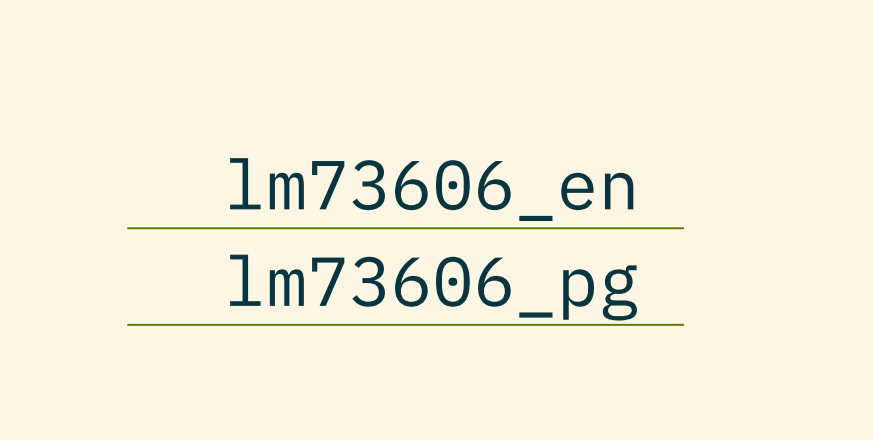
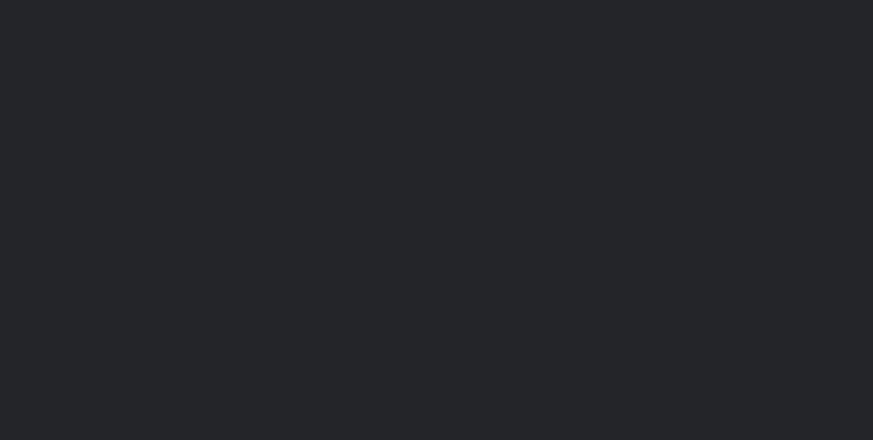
label: lm73606_en (431, 189) -> none
wire: (128, 228) (683, 228) -> none
label: lm73606_pg (433, 287) -> none
wire: (128, 324) (683, 324) -> none

